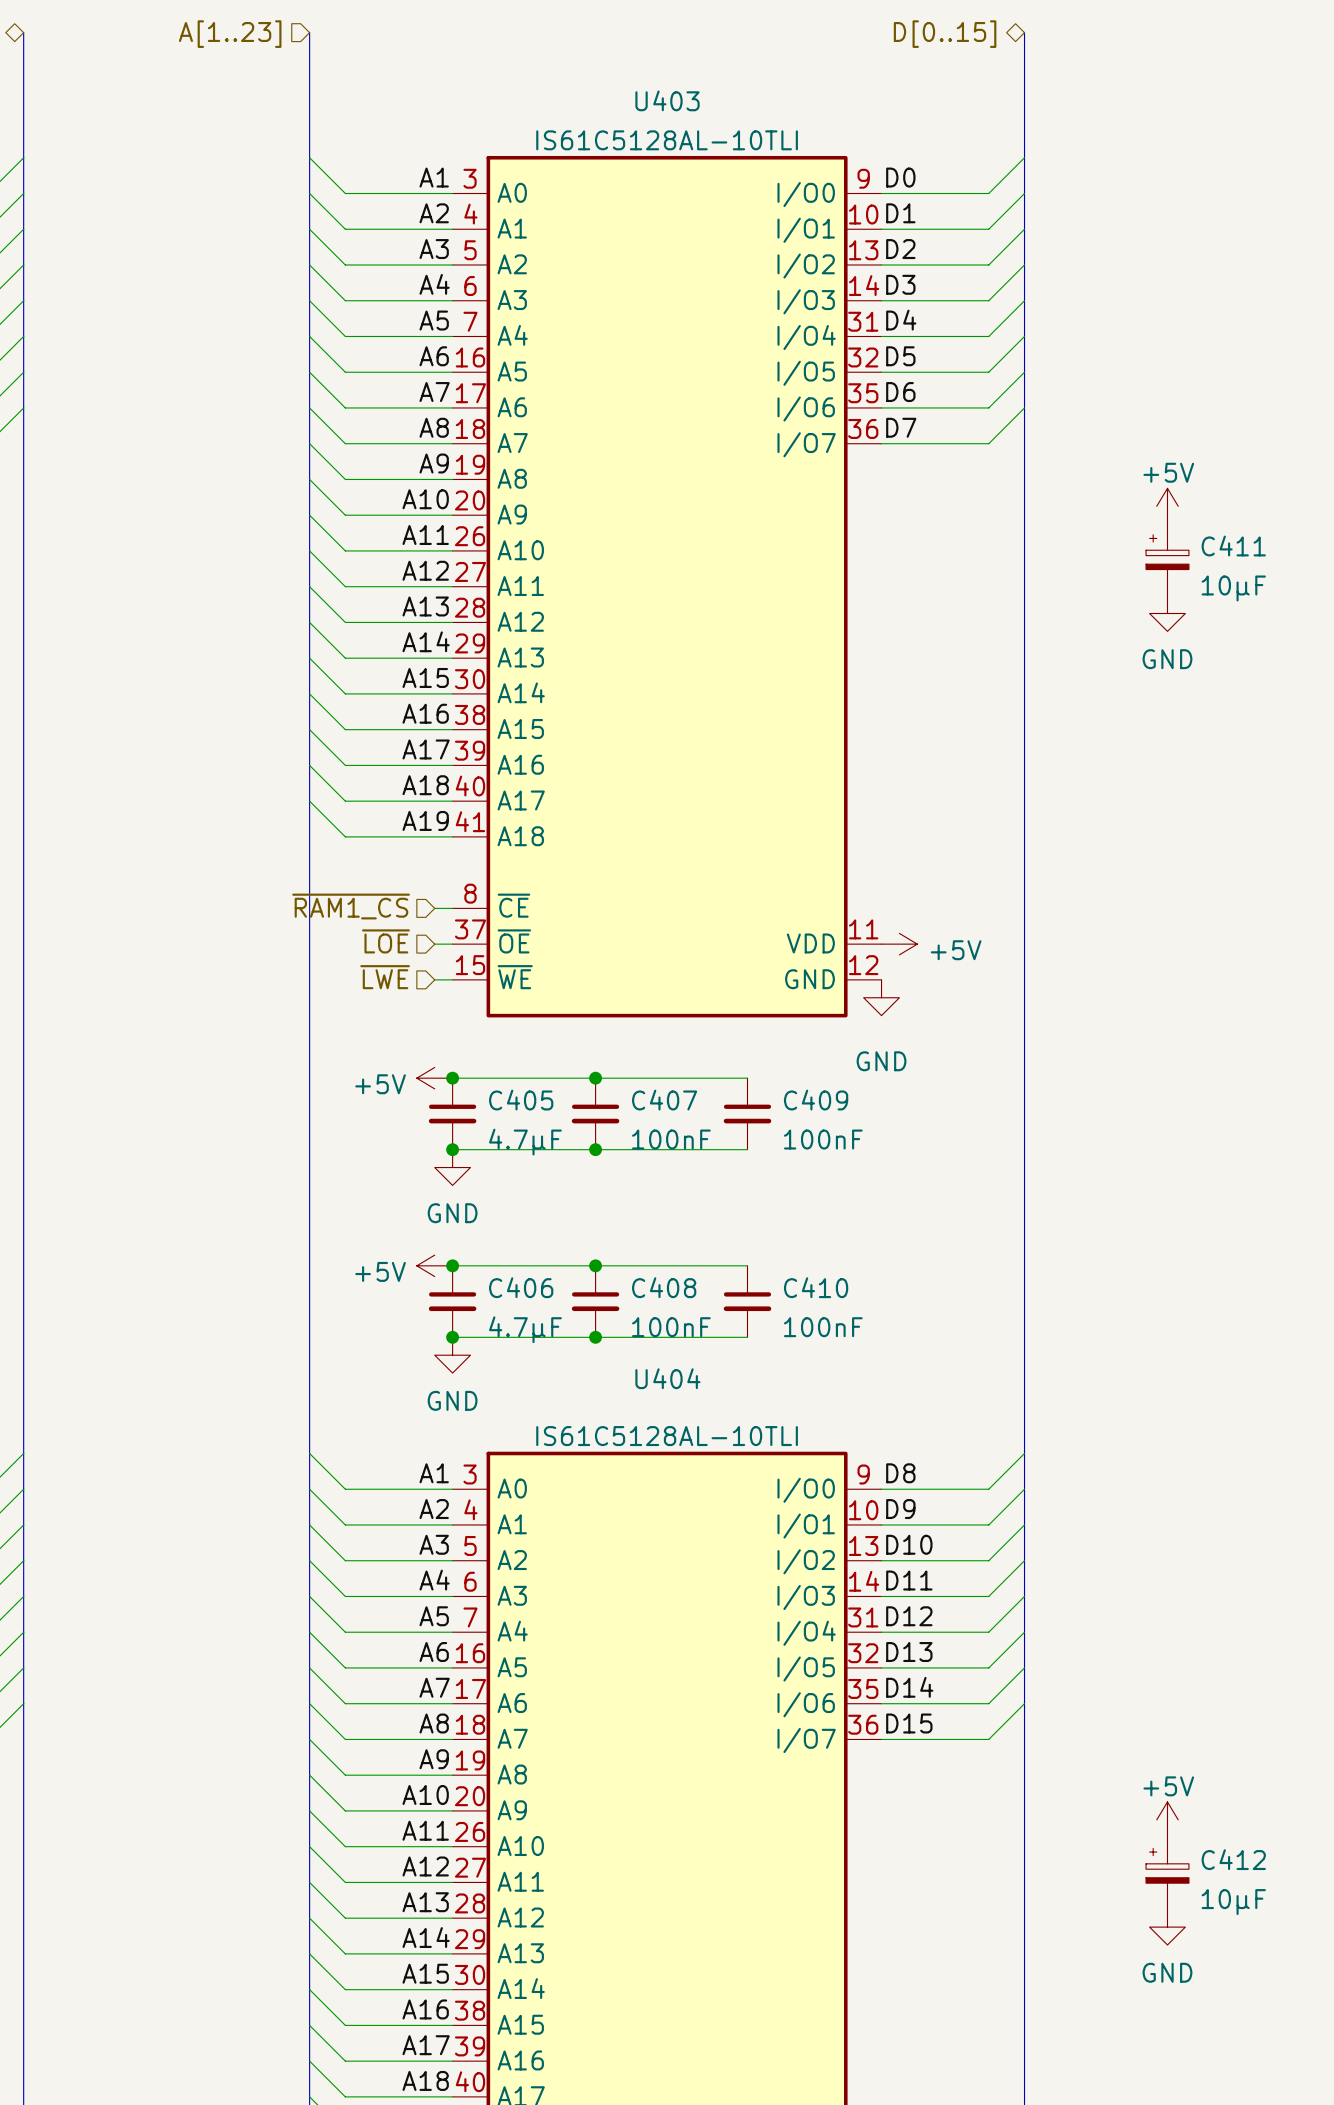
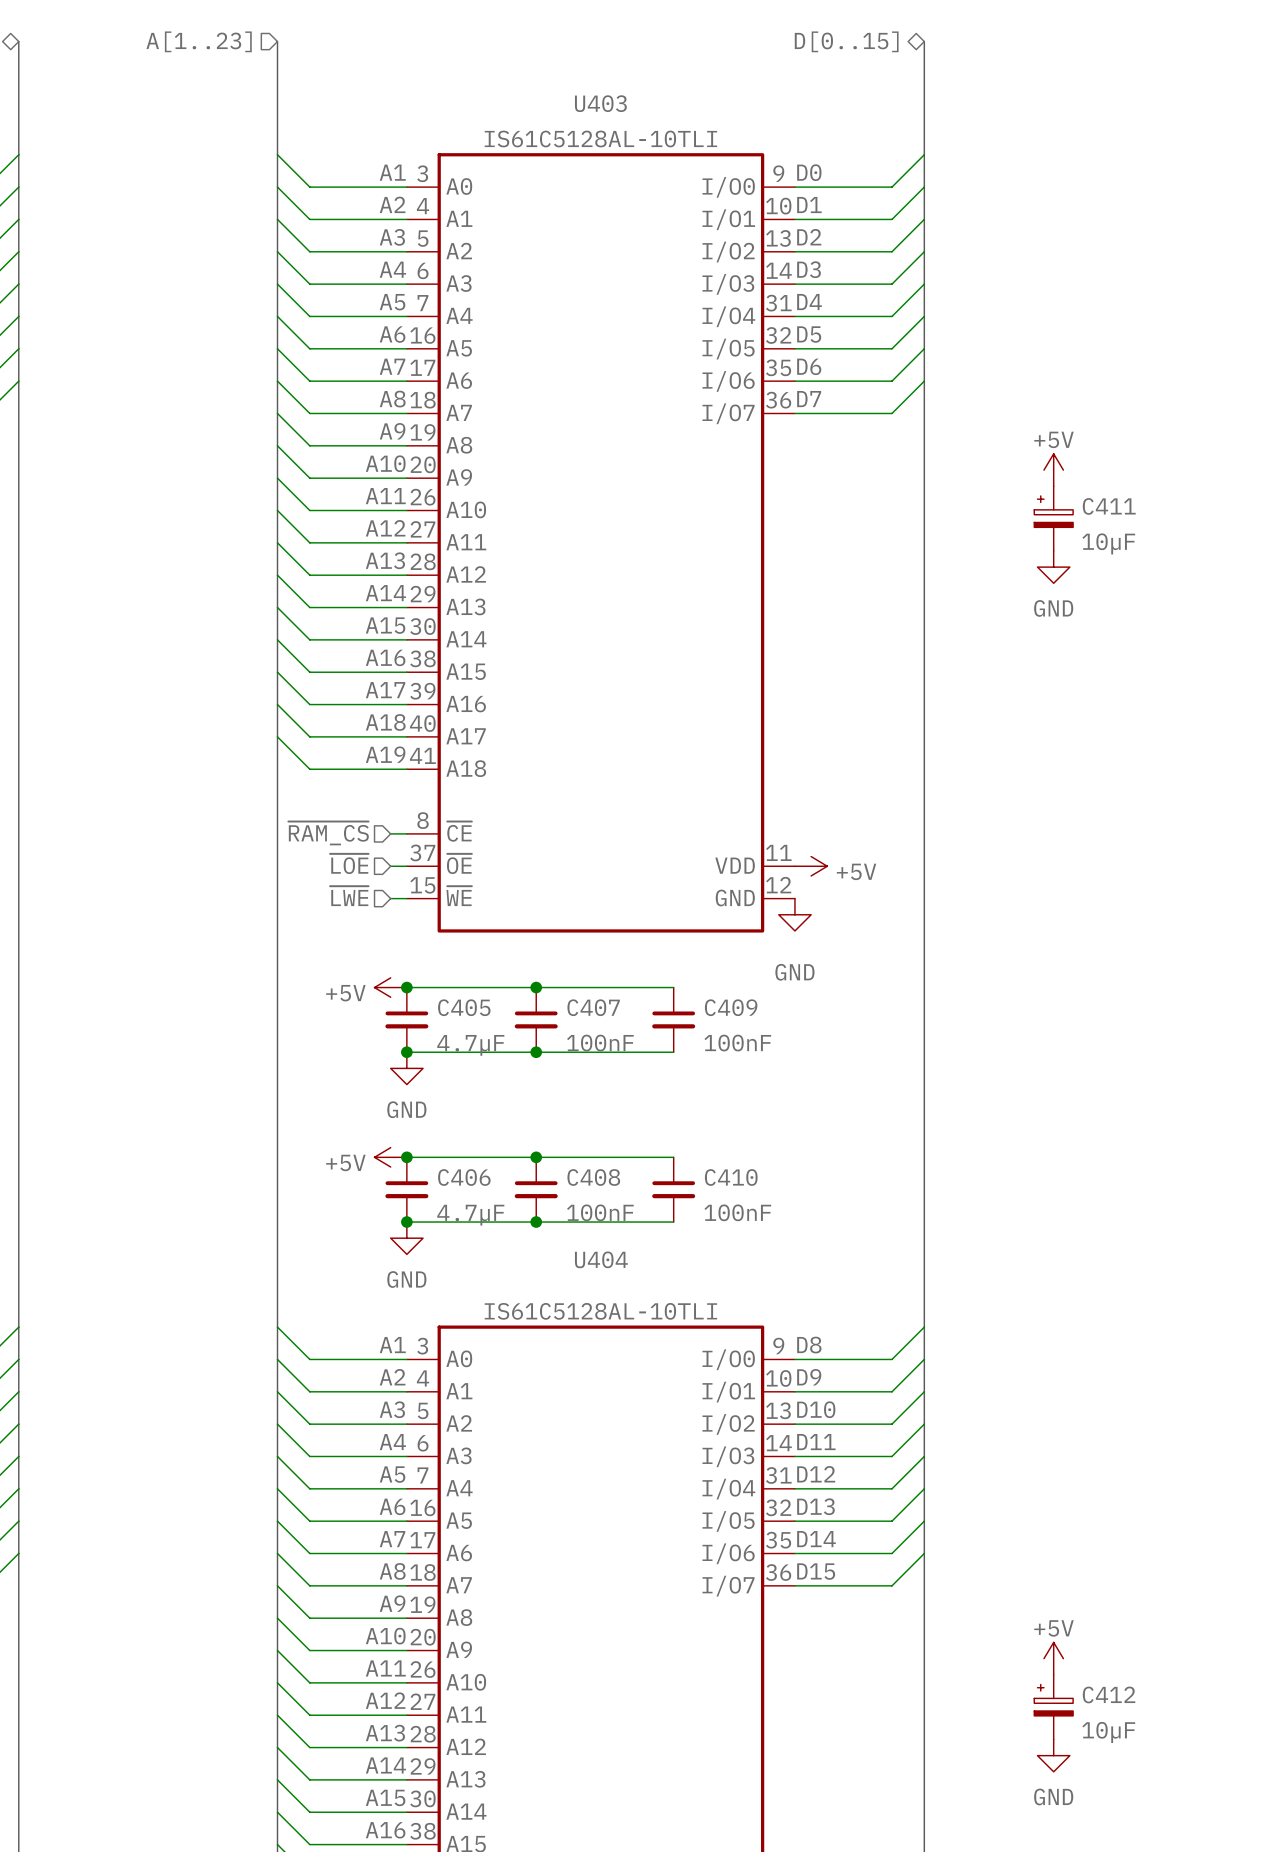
hierarchical label: ~{RAM1_CS} (351, 906) -> ~{RAM_CS} (328, 833)

